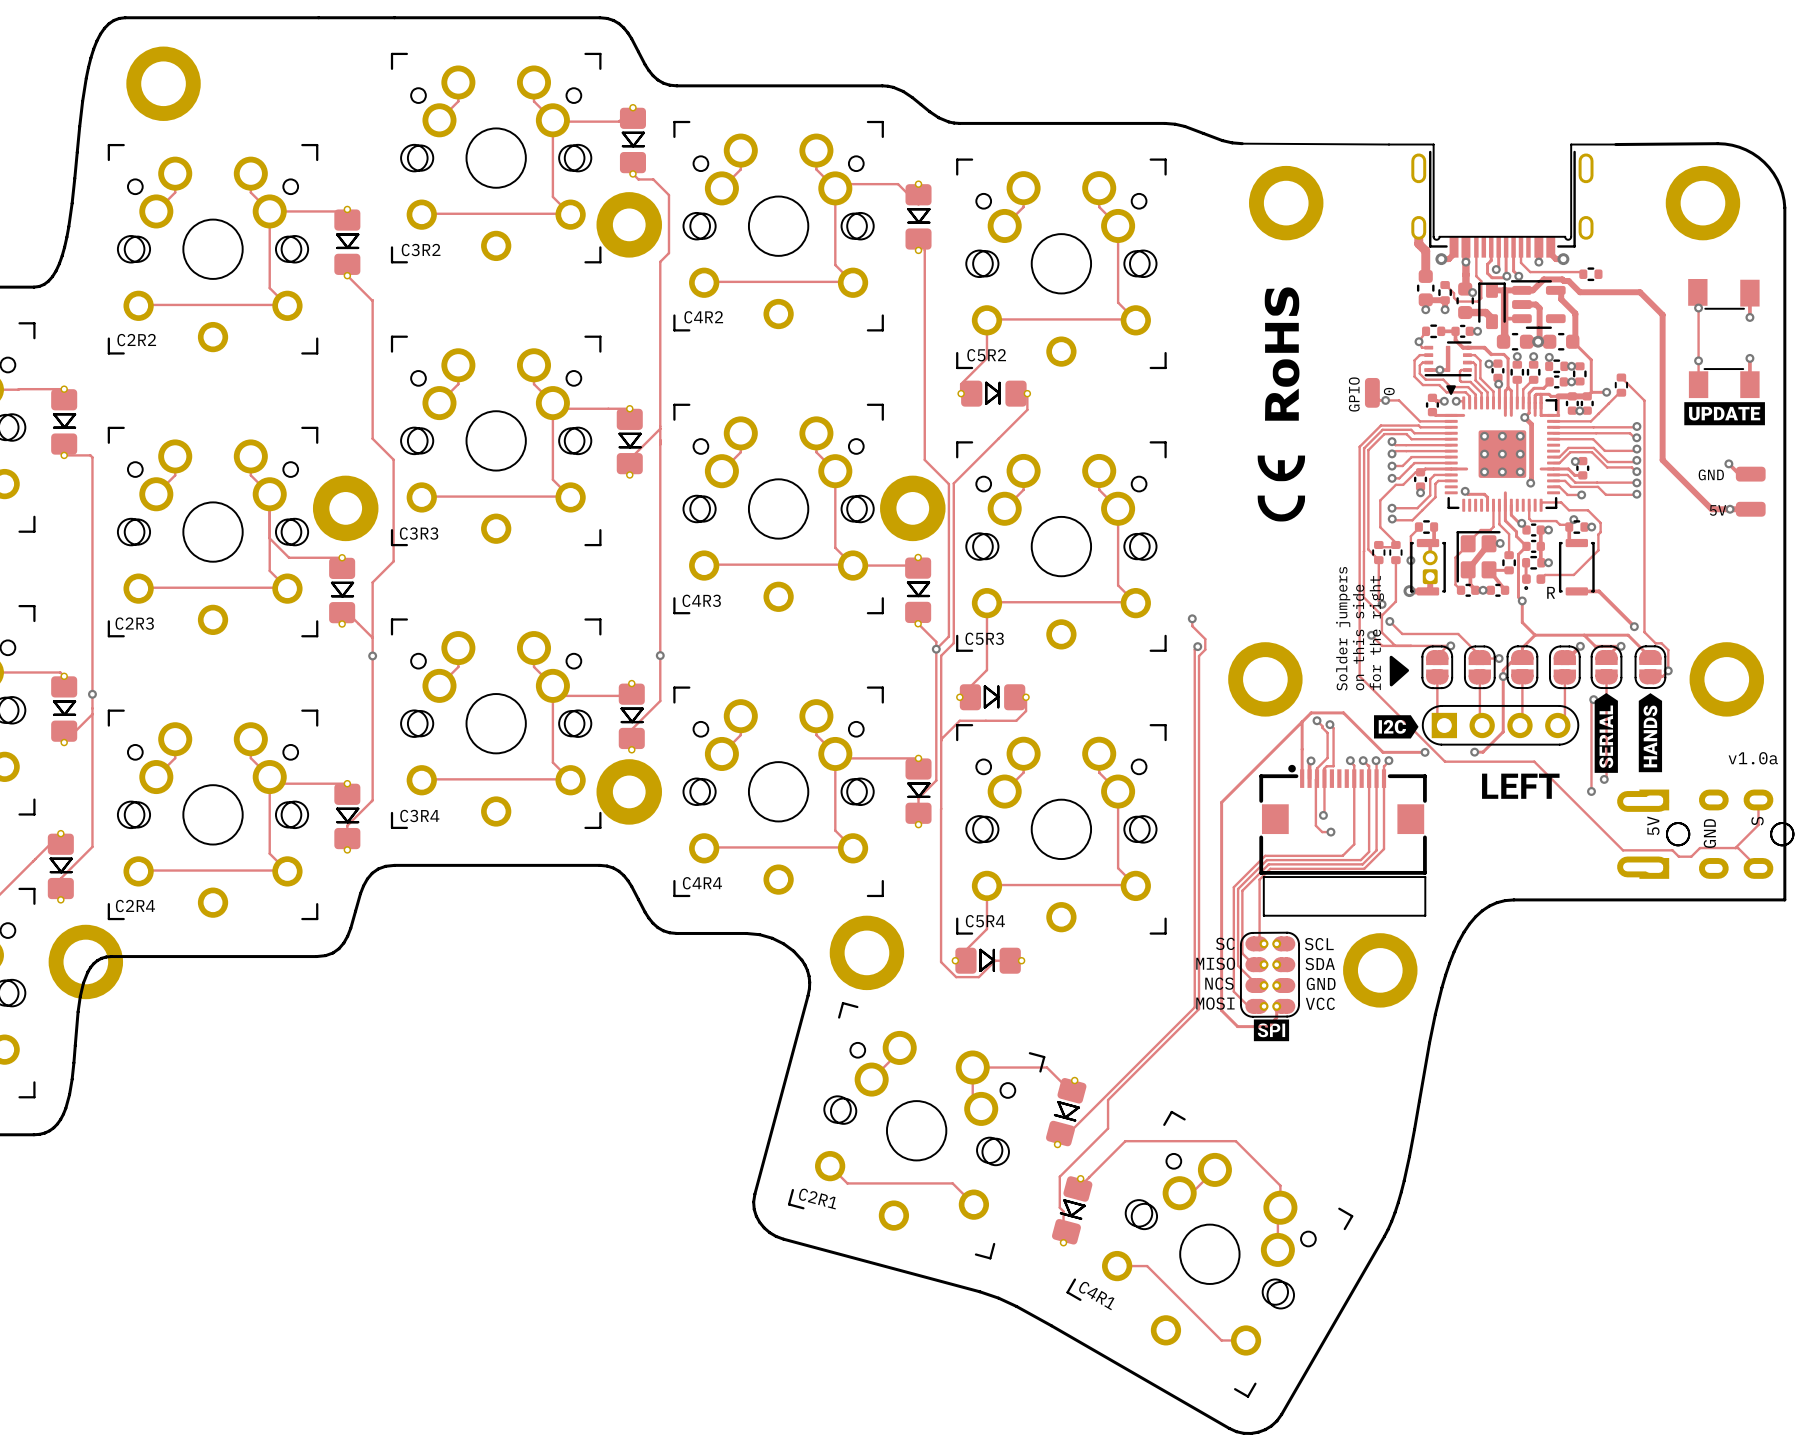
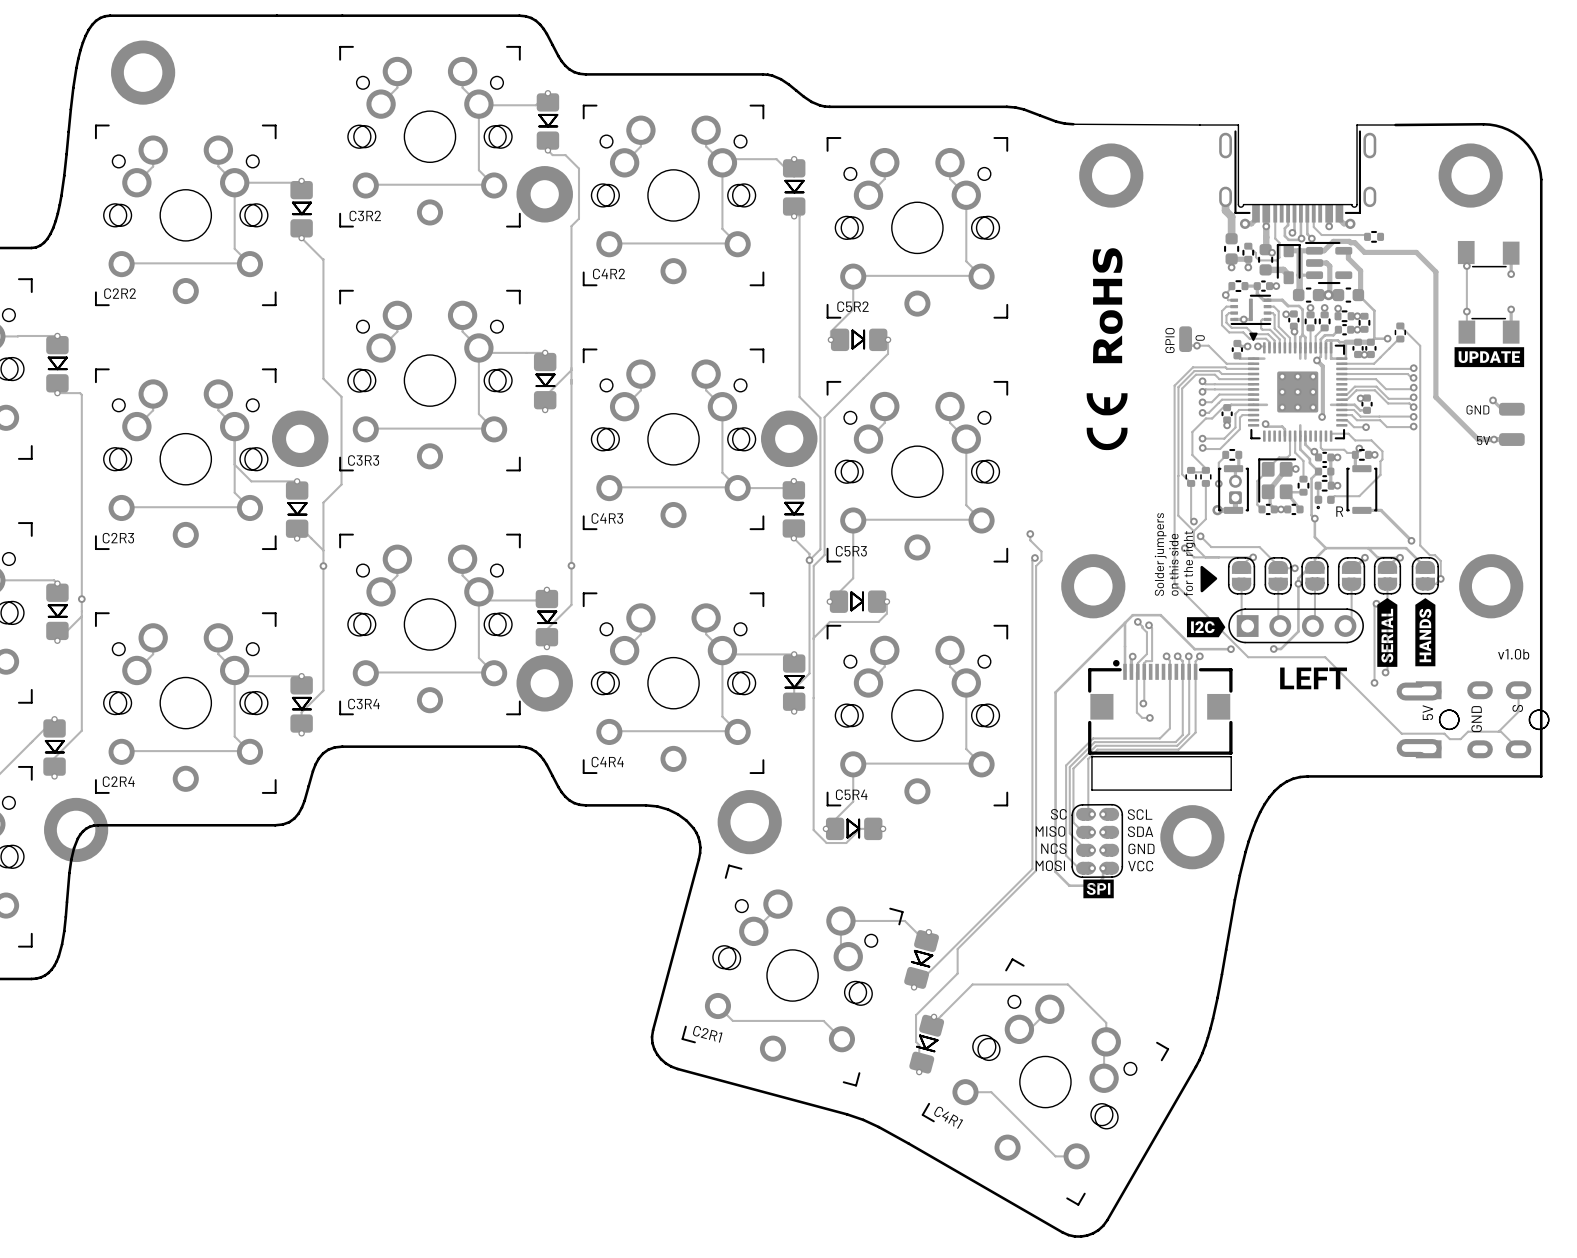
text: v1.0a (1753, 758) -> v1.0b (1513, 654)

